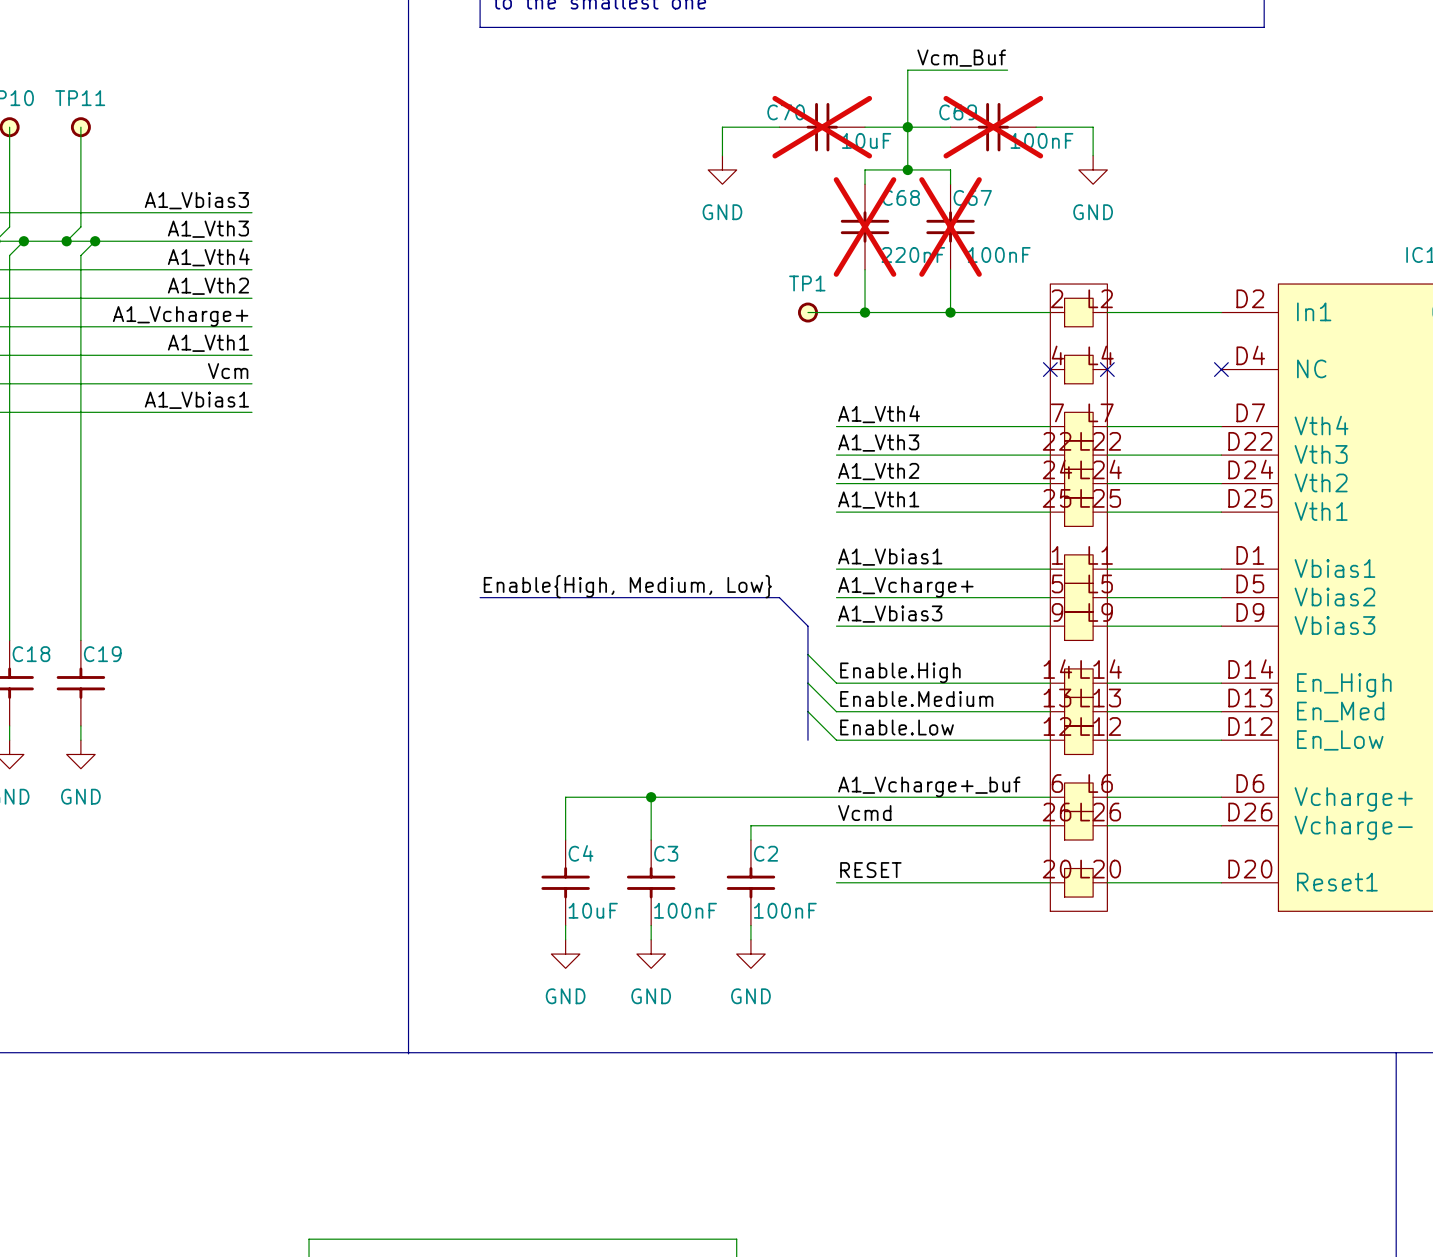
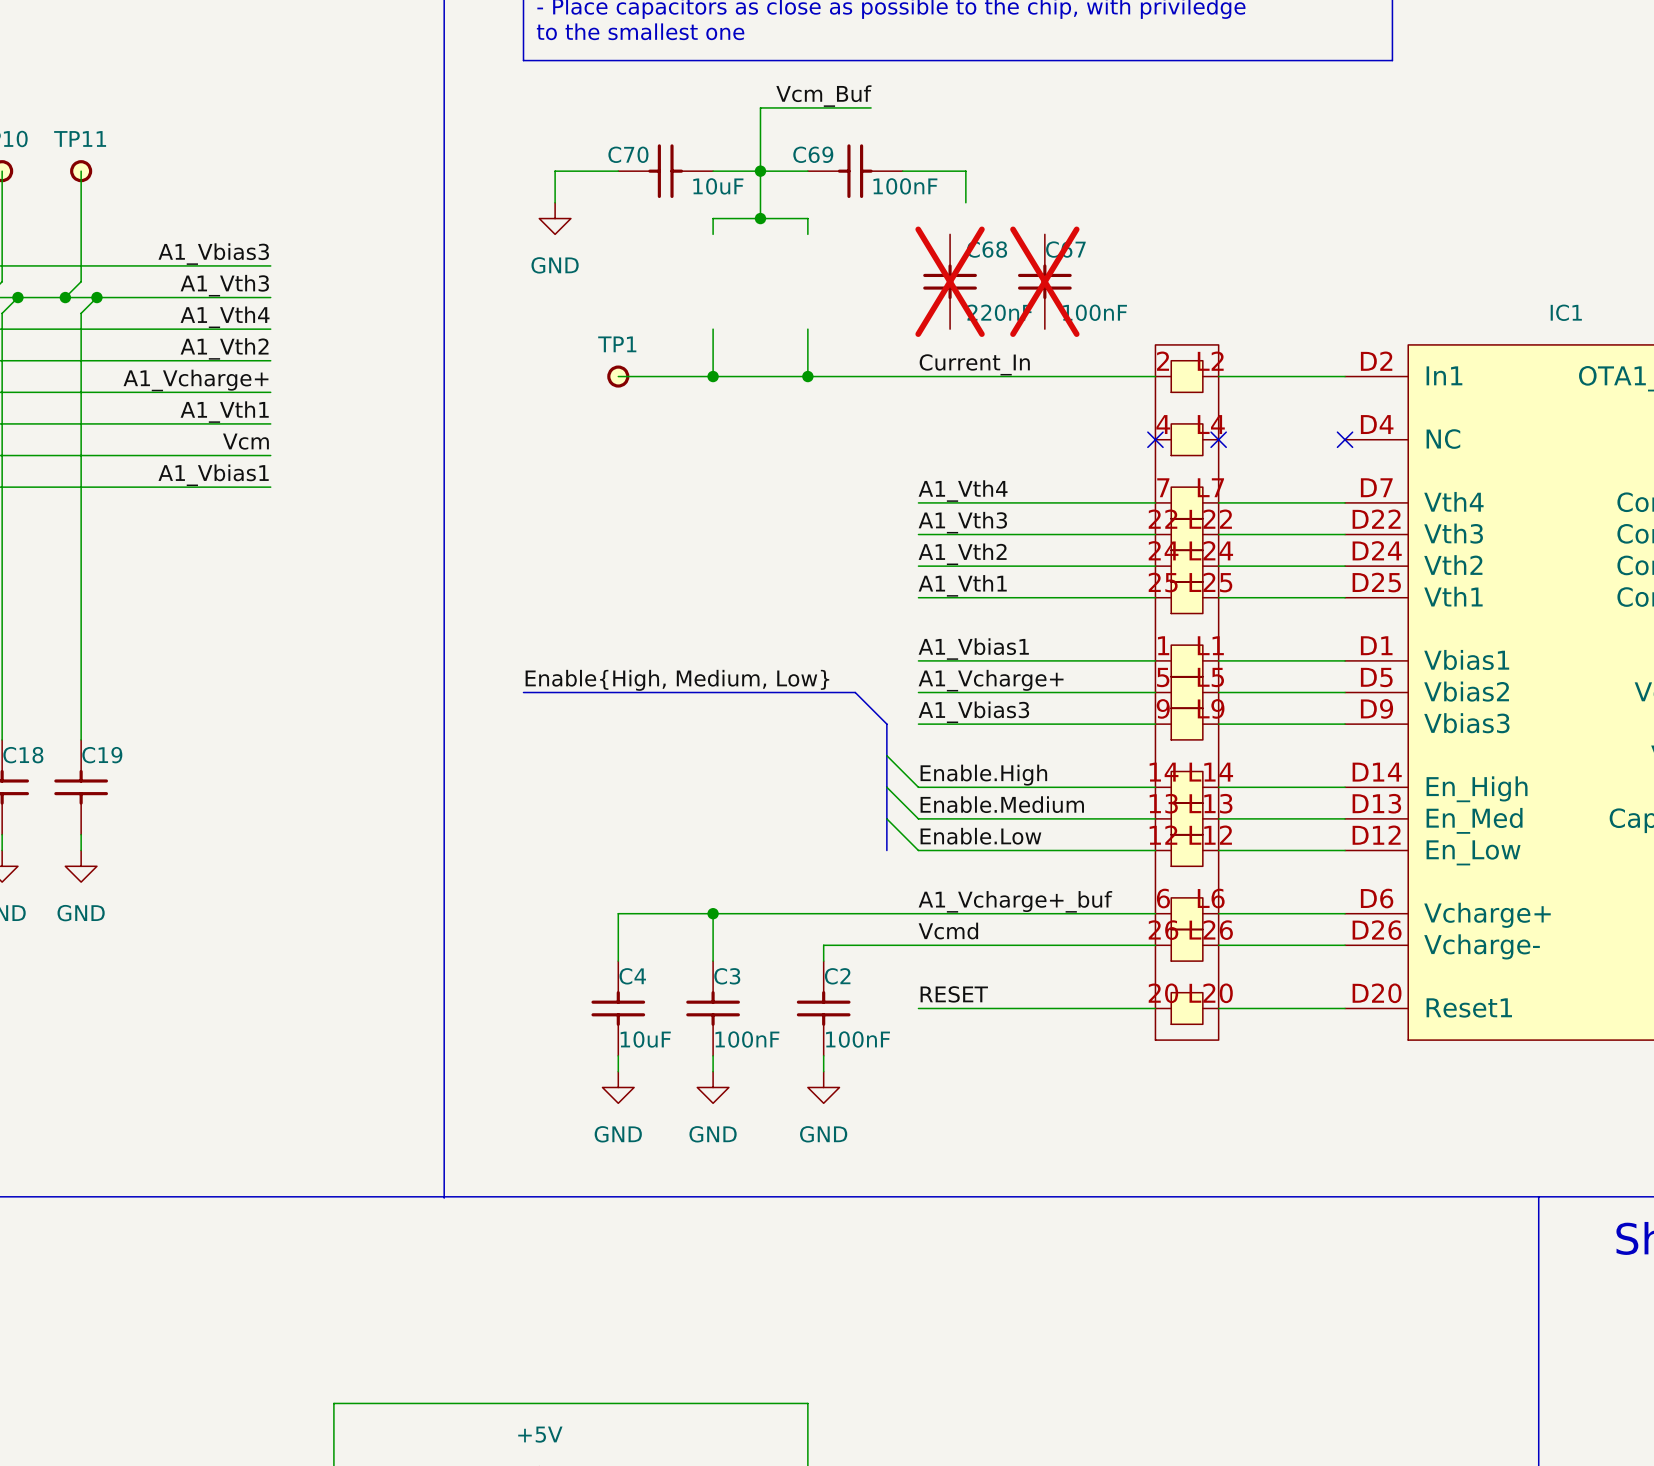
label position: Vcm_Buf (961, 58) -> Vcm_Buf (823, 96)
wire: (1007, 70) (907, 70) (907, 169) -> (871, 107) (760, 107) (760, 218)
wire: none -> (618, 171) (555, 171) (555, 202)
junction: none -> (760, 171)
wire: (722, 127) (722, 155) -> (792, 171) (713, 171)
C70 position: (822, 127) -> (665, 171)
C70 do-not-place cross: (822, 127) -> none
wire: (879, 127) (950, 127) -> (965, 171) (965, 202)
junction: (907, 127) -> none
C69 position: (993, 127) -> (855, 171)
C69 do-not-place cross: (993, 127) -> none
wire: (1036, 127) (1093, 127) (1093, 155) -> none
junction: none -> (760, 218)
power symbol position: GND (722, 169) -> GND (555, 218)
junction: (907, 169) -> none
power symbol: GND (1093, 169) -> none
wire: (865, 184) (865, 169) (950, 169) (950, 184) -> (713, 234) (713, 218) (807, 218) (807, 234)
wire: (865, 269) (865, 312) -> (713, 329) (713, 376)
wire: (950, 269) (950, 312) -> (807, 329) (807, 376)
label: none -> Current_In (974, 364)
wire: none -> (618, 376) (886, 376)
junction: none -> (713, 376)
junction: none -> (807, 376)
TP1 position: (807, 312) -> (618, 376)
junction: (865, 312) -> none
junction: (950, 312) -> none

